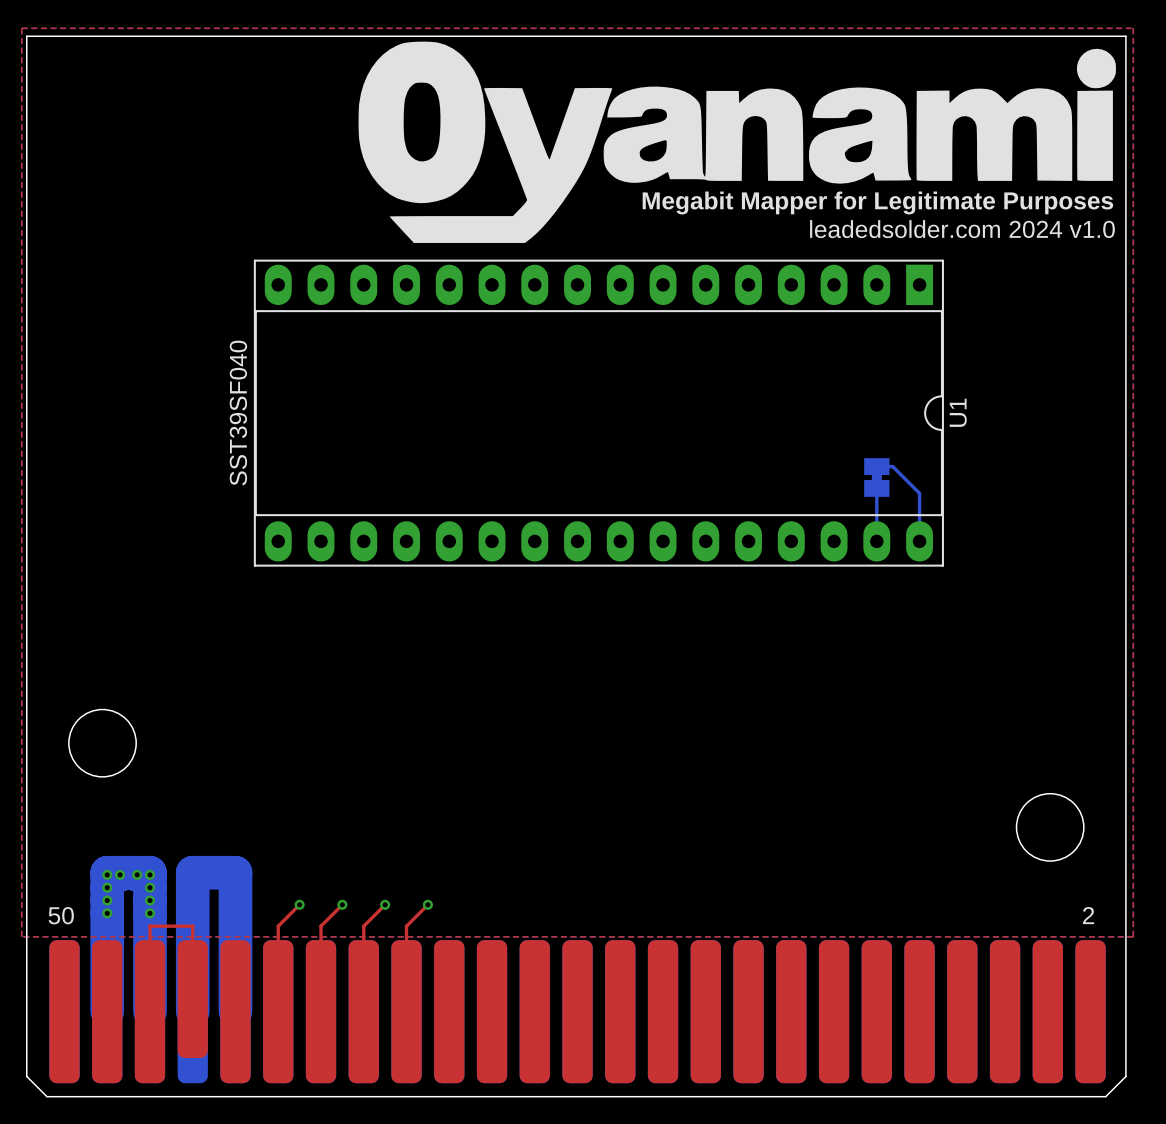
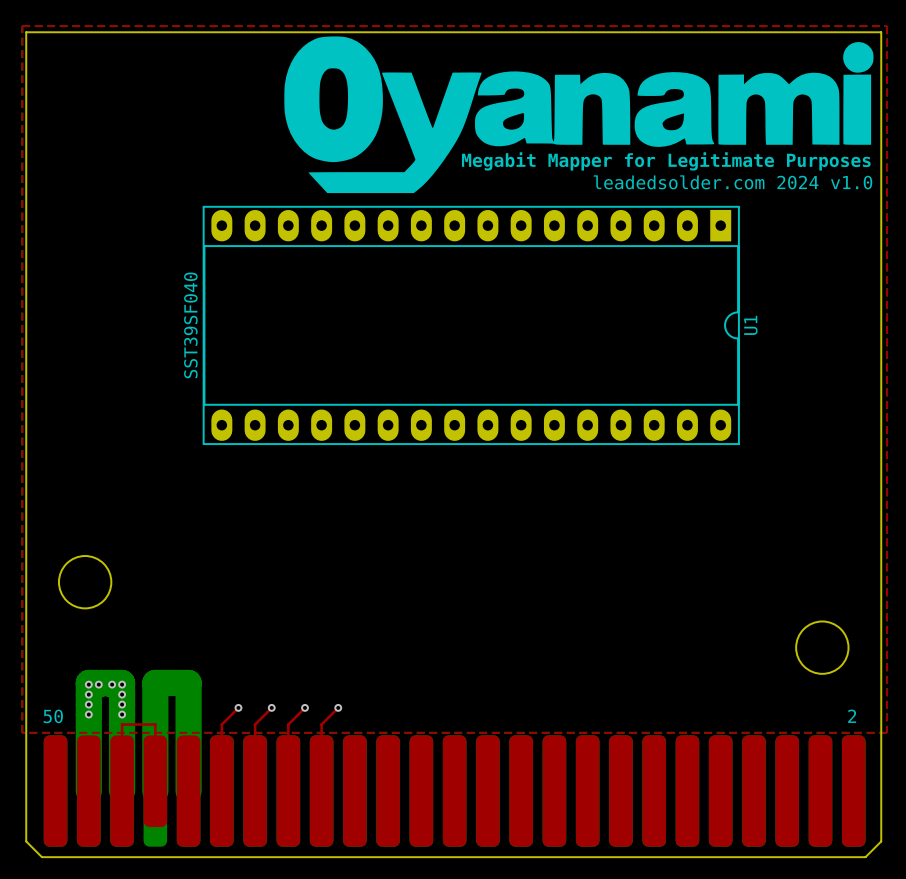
bottom track: (876, 466) (892, 466) (919, 493) (919, 541) -> none
part: (876, 477) -> none
bottom track: (876, 488) (876, 541) -> none

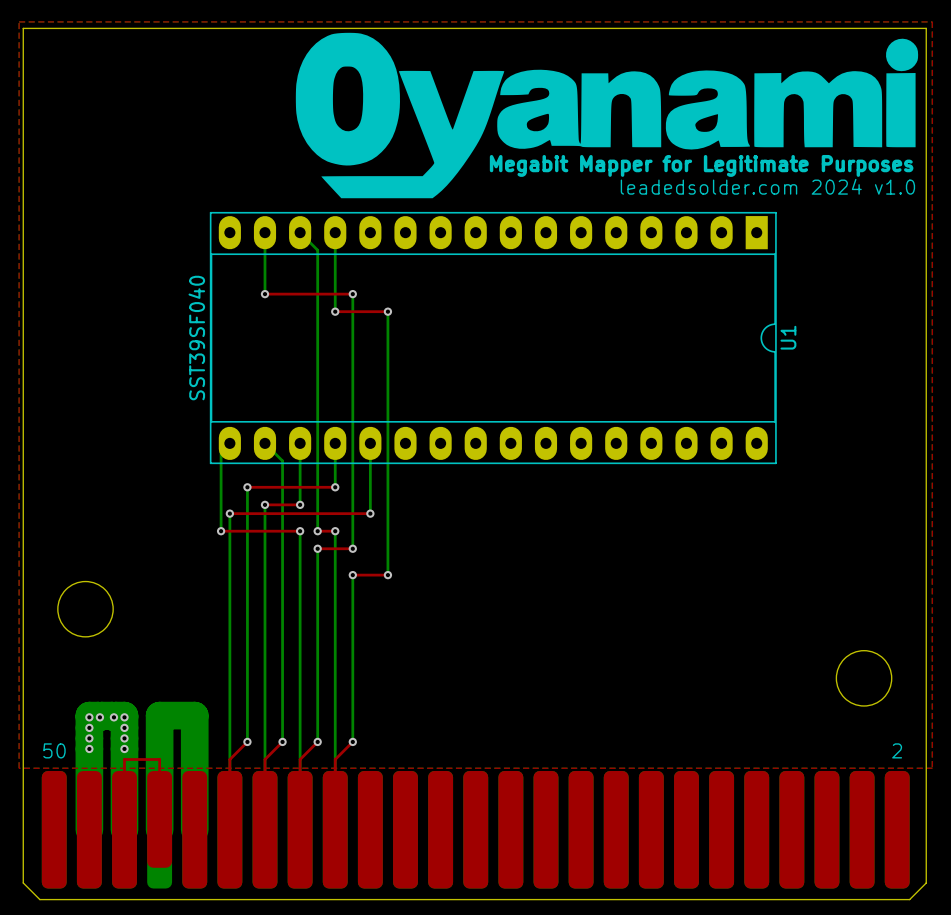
bottom track: none -> (265, 232) (265, 294)
bottom track: none -> (300, 232) (317, 250) (317, 531)
bottom track: none -> (335, 232) (335, 311)
top track: none -> (265, 294) (352, 294)
via: none -> (265, 294)
bottom track: none -> (352, 294) (352, 548)
via: none -> (352, 294)
top track: none -> (335, 311) (387, 311)
via: none -> (335, 311)
bottom track: none -> (387, 311) (387, 575)
via: none -> (387, 311)
bottom track: none -> (265, 443) (282, 460) (282, 741)
bottom track: none -> (300, 443) (300, 504)
bottom track: none -> (335, 443) (335, 487)
bottom track: none -> (370, 443) (370, 513)
bottom track: none -> (221, 452) (221, 531)
top track: none -> (247, 487) (335, 487)
bottom track: none -> (247, 487) (247, 741)
via: none -> (247, 487)
via: none -> (335, 487)
top track: none -> (265, 504) (300, 504)
bottom track: none -> (265, 504) (265, 829)
via: none -> (265, 504)
via: none -> (300, 504)
top track: none -> (229, 513) (370, 513)
bottom track: none -> (229, 513) (229, 829)
via: none -> (229, 513)
via: none -> (370, 513)
top track: none -> (221, 531) (300, 531)
via: none -> (221, 531)
bottom track: none -> (300, 531) (300, 829)
via: none -> (300, 531)
top track: none -> (317, 531) (335, 531)
via: none -> (317, 531)
bottom track: none -> (335, 531) (335, 829)
via: none -> (335, 531)
top track: none -> (317, 548) (352, 548)
bottom track: none -> (317, 548) (317, 741)
via: none -> (317, 548)
via: none -> (352, 548)
top track: none -> (352, 575) (387, 575)
bottom track: none -> (352, 575) (352, 741)
via: none -> (352, 575)
via: none -> (387, 575)

